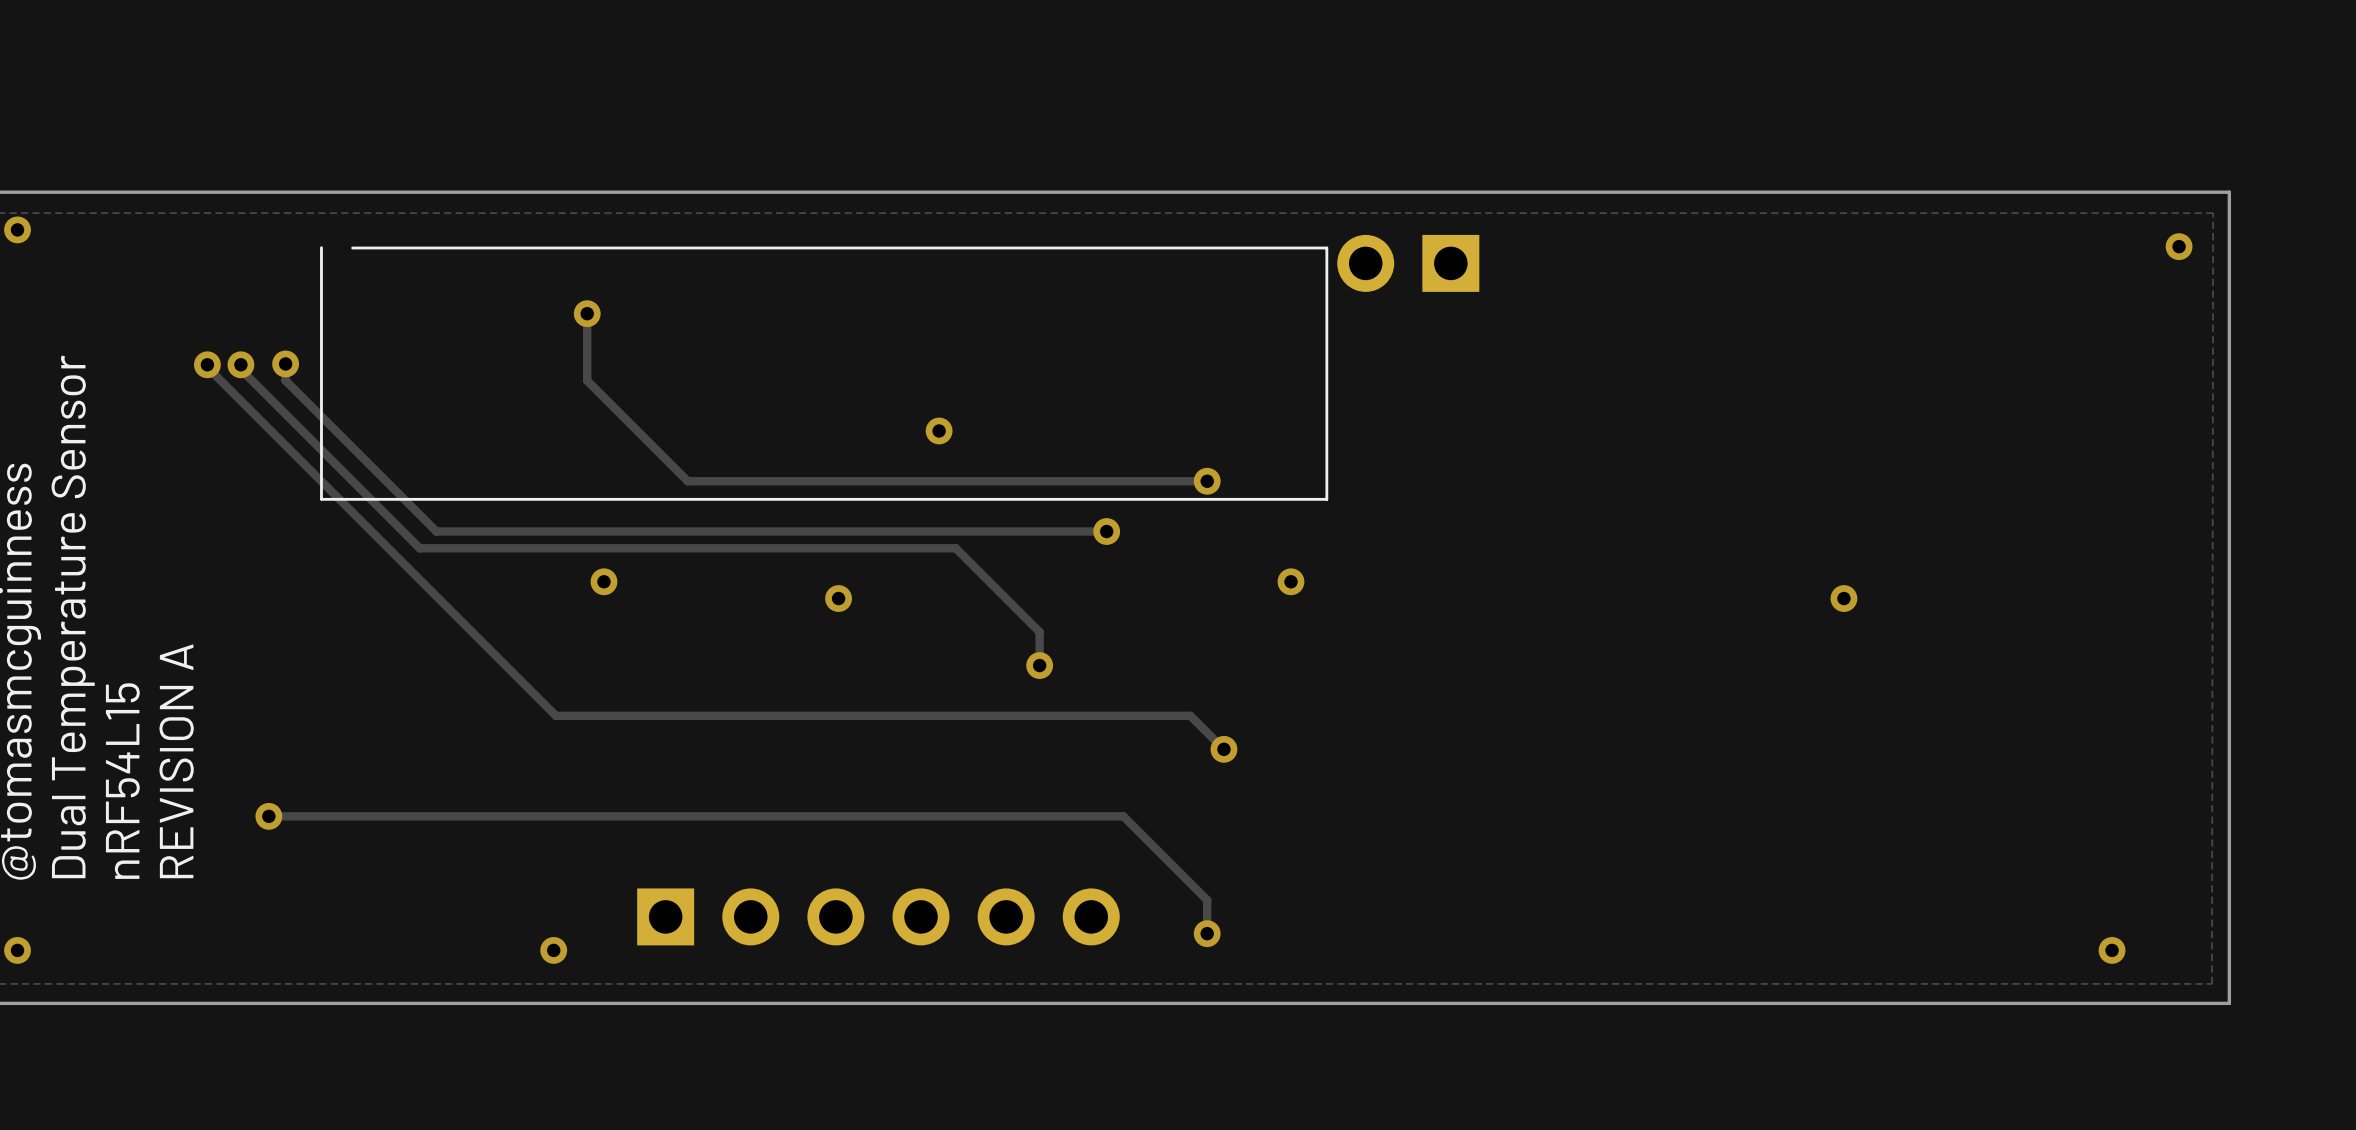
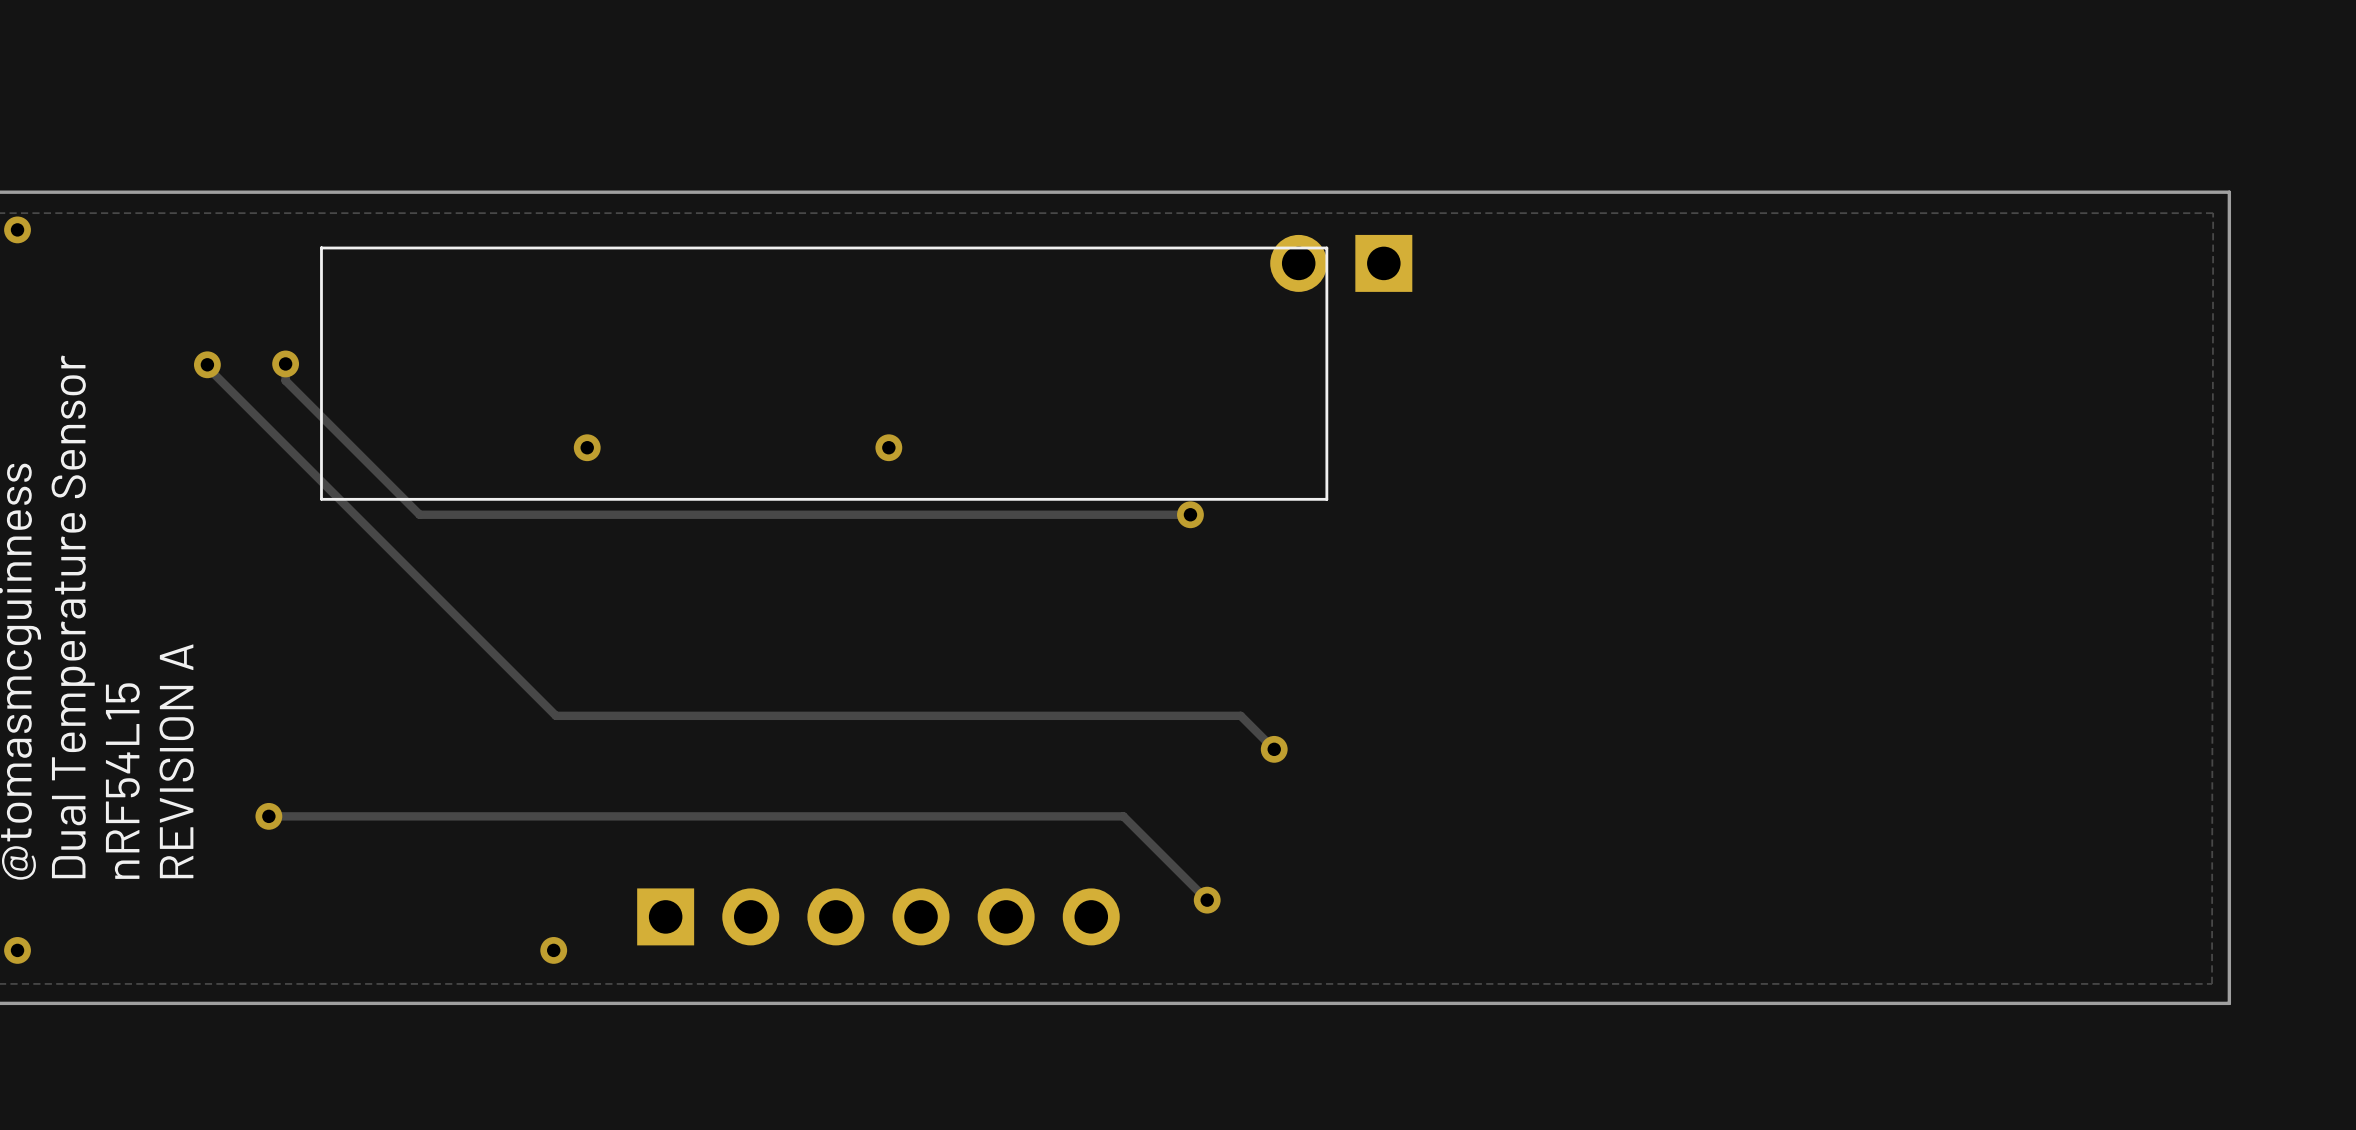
via: (2179, 246) -> none
line: none -> (352, 248) (321, 248)
part position: (1408, 263) -> (1341, 263)
track: (587, 313) (587, 380) (687, 481) (1207, 481) -> none
via: (587, 313) -> none
track: (240, 364) (240, 369) (419, 548) (955, 548) (1039, 632) (1039, 665) -> none
via: (240, 364) -> none
via position: (939, 430) -> (888, 447)
via: none -> (587, 447)
via position: (1207, 481) -> (1190, 514)
track: (419, 514) (436, 531) (1106, 531) -> (419, 514) (1190, 514)
via: (1106, 531) -> none
via: (603, 581) -> none
via: (1290, 581) -> none
via: (838, 598) -> none
via: (1843, 598) -> none
via: (1039, 665) -> none
track: (1190, 715) (1223, 749) -> (1190, 715) (1240, 715) (1274, 749)
via position: (1223, 749) -> (1274, 749)
track: (1207, 900) (1207, 933) -> none
via position: (1207, 933) -> (1207, 900)
via: (2112, 950) -> none

